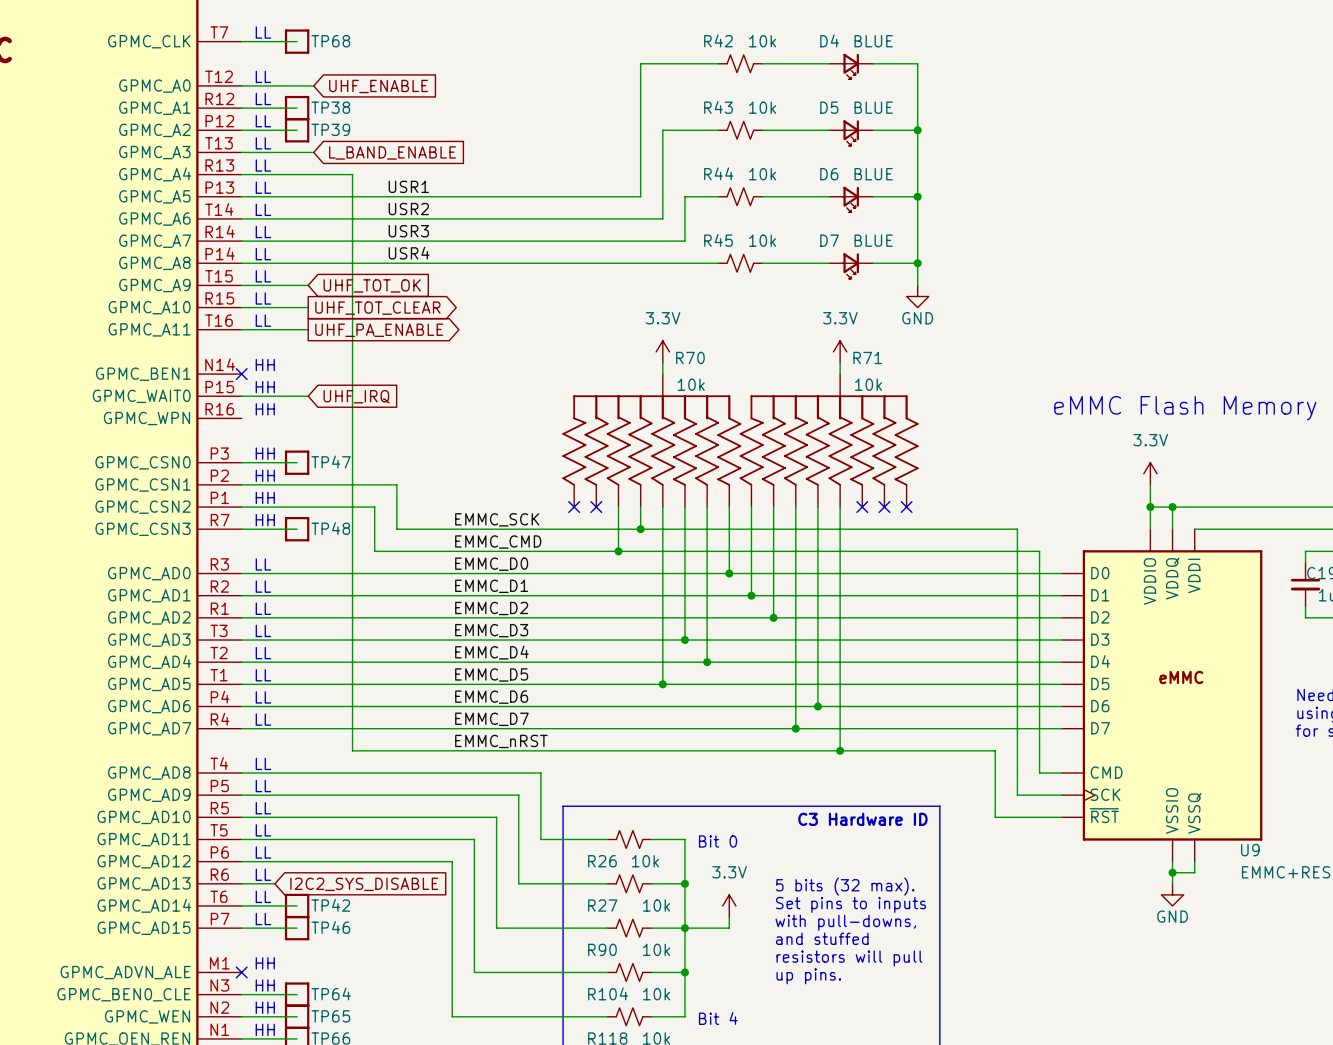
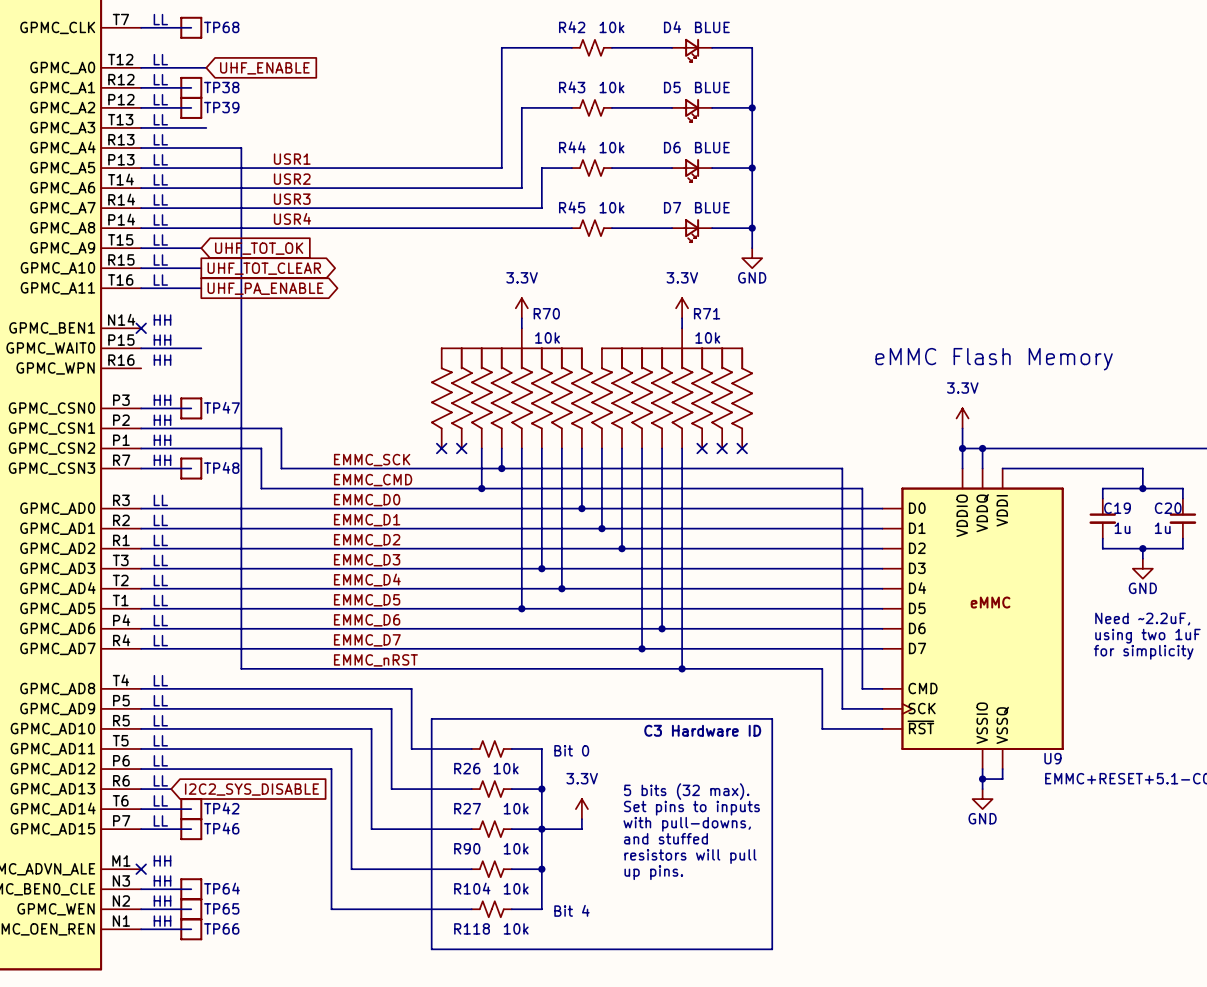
global label: L_BAND_ENABLE (392, 152) -> none
global label: UHF_IRQ (356, 396) -> none

